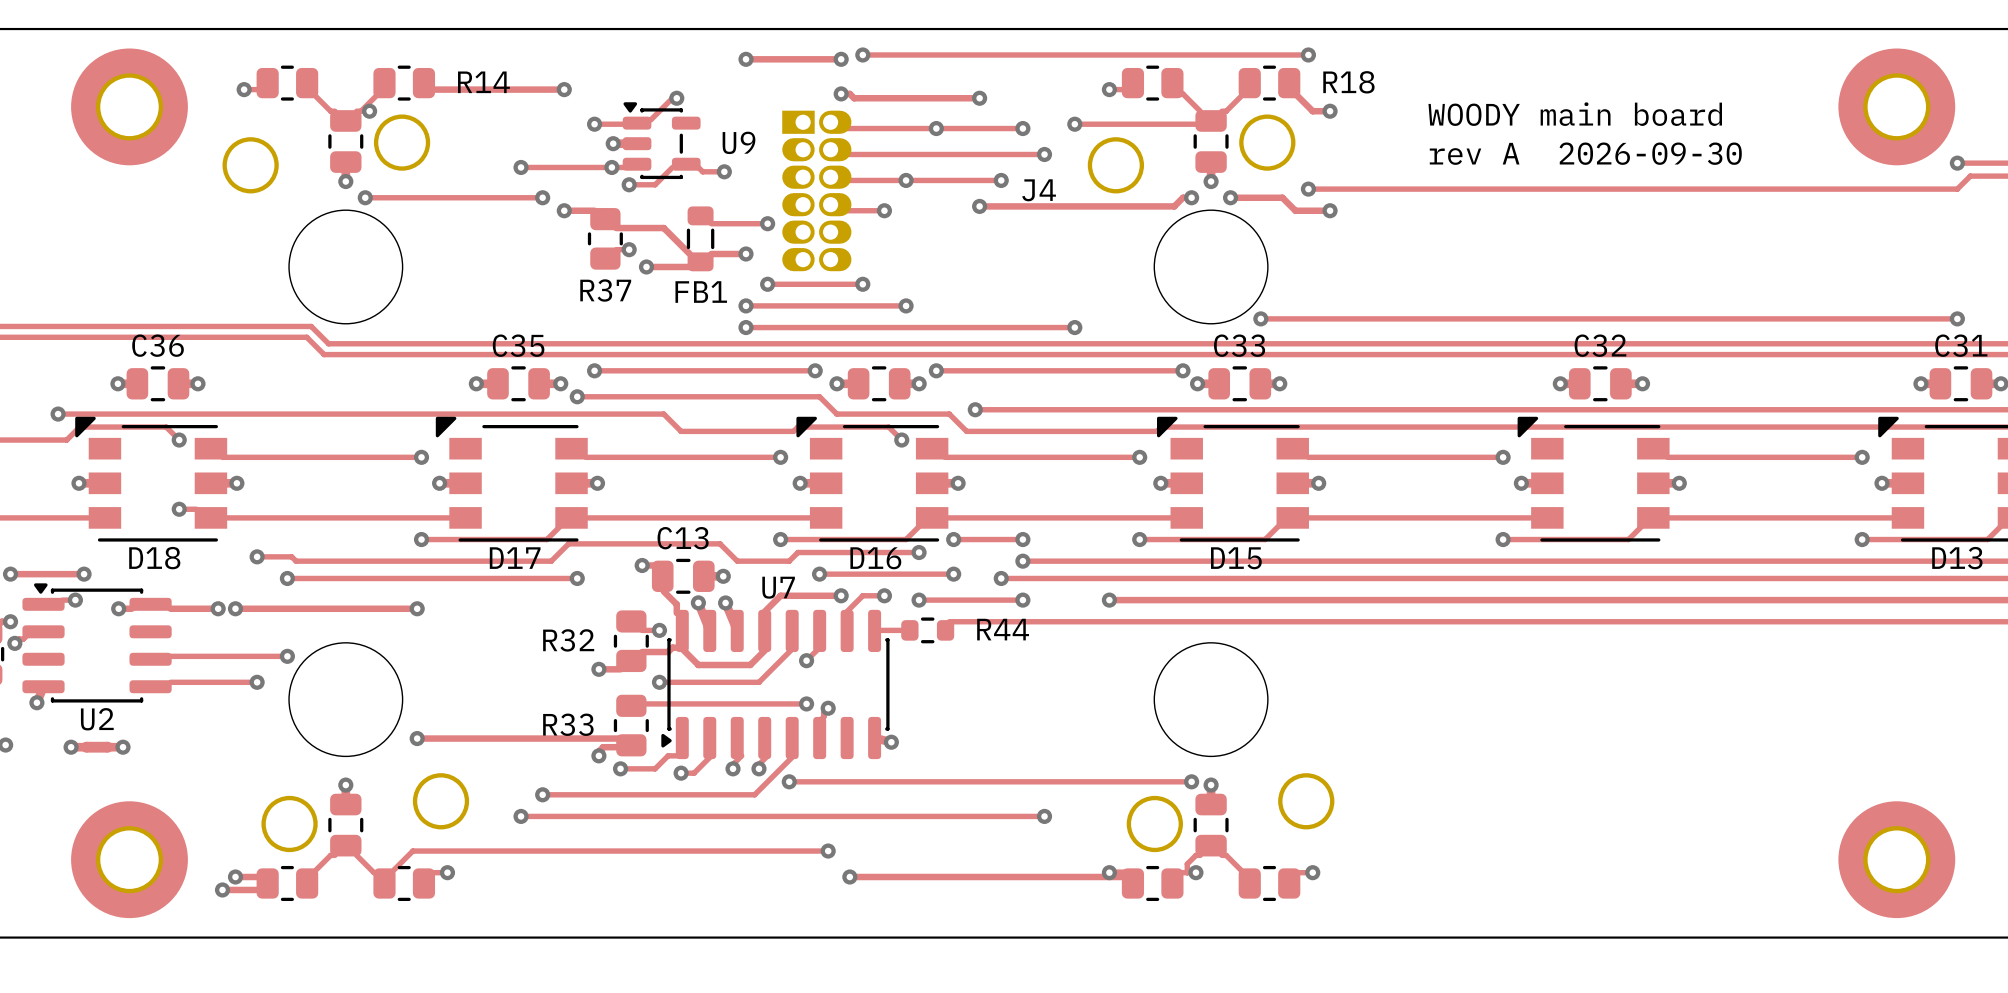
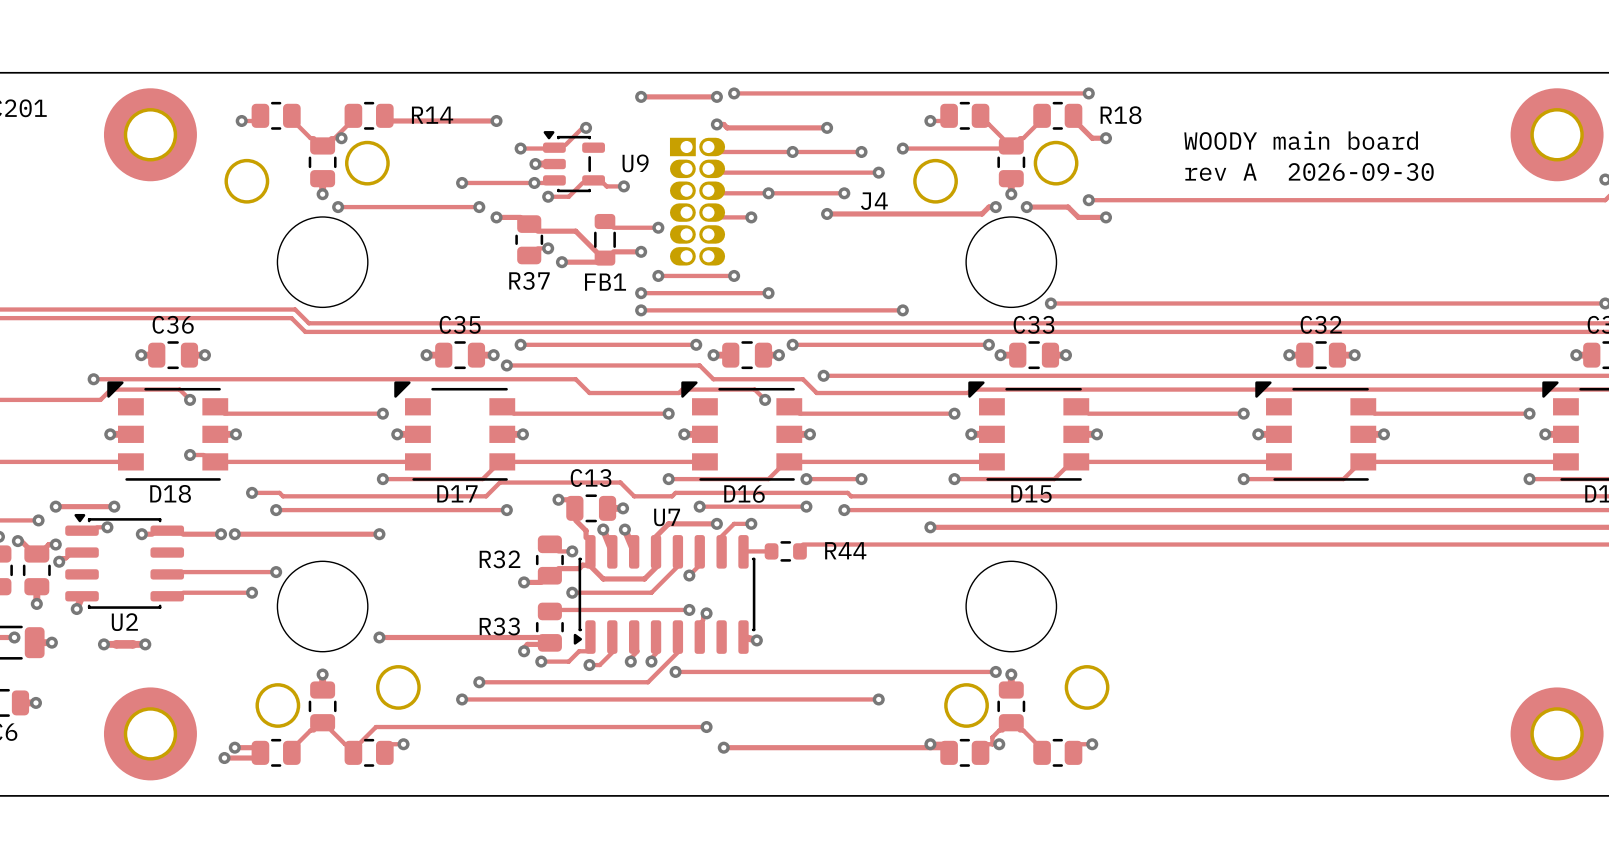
track: (919, 552) (797, 552) (789, 561) (784, 561) -> (861, 496) (851, 496) (847, 492) (675, 492) (672, 496)
via: (919, 552) -> none
via: (1022, 561) -> none
track: (919, 600) (1022, 600) -> none
via: (919, 600) -> none
via: (1022, 600) -> none

